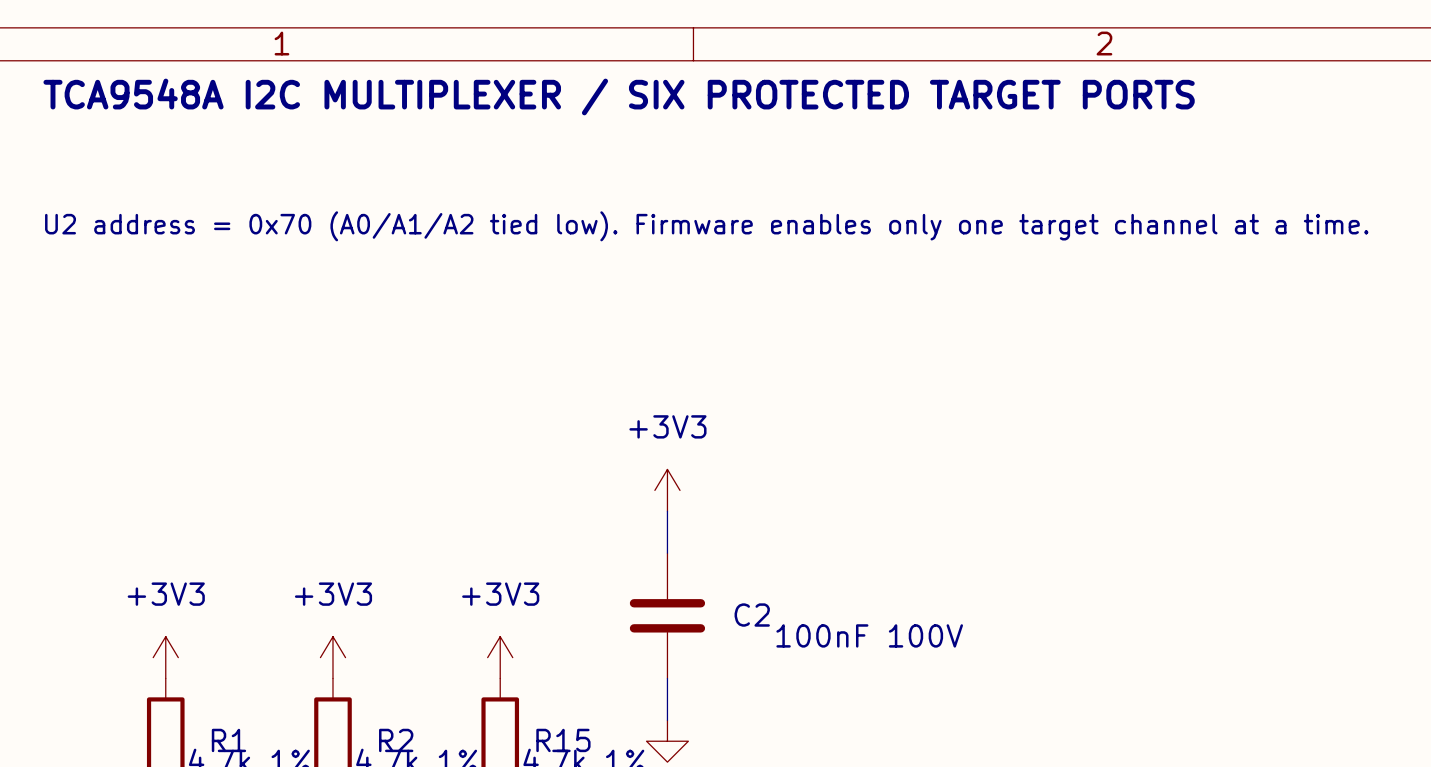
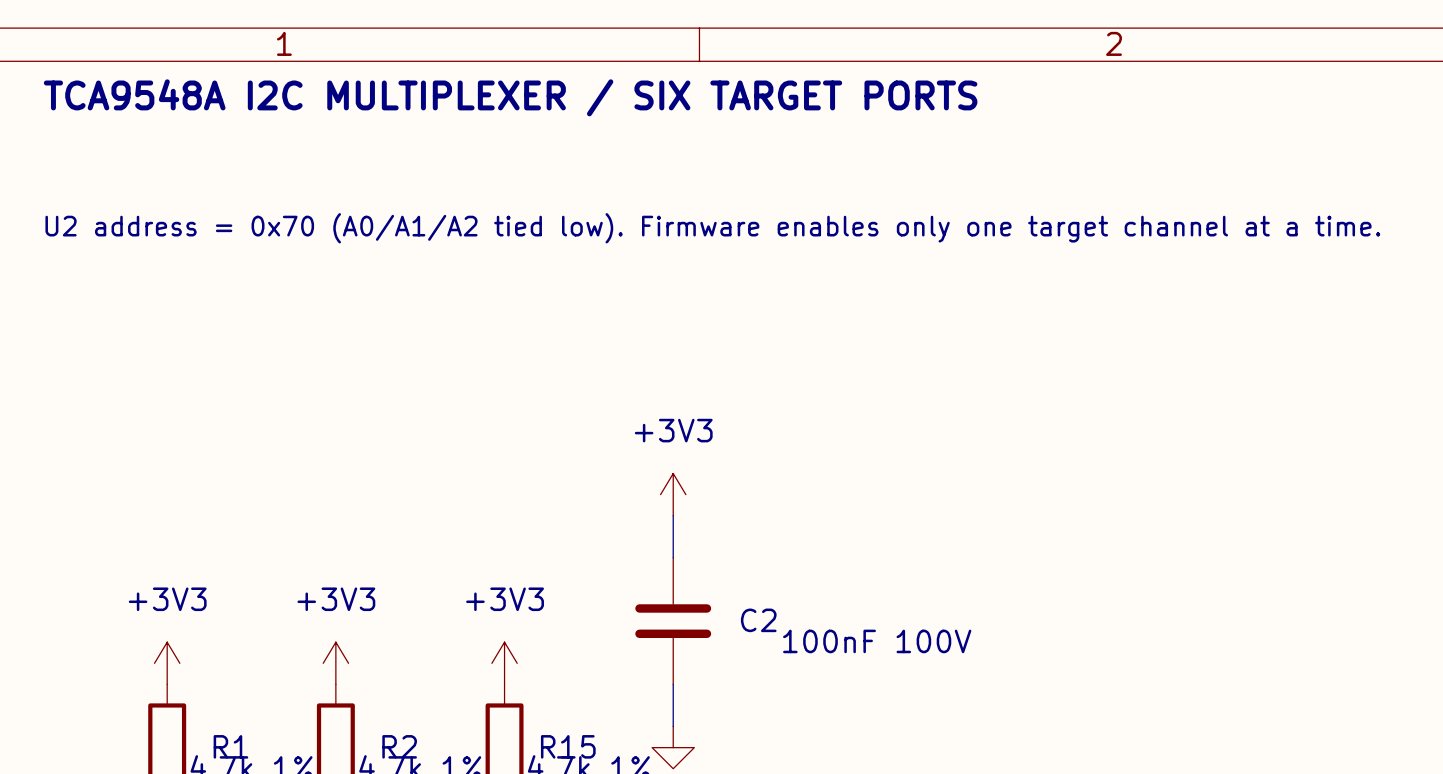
text: TCA9548A I2C MULTIPLEXER / SIX PROTECTED TARGET PORTS (619, 96) -> TCA9548A I2C MULTIPLEXER / SIX TARGET PORTS (510, 97)

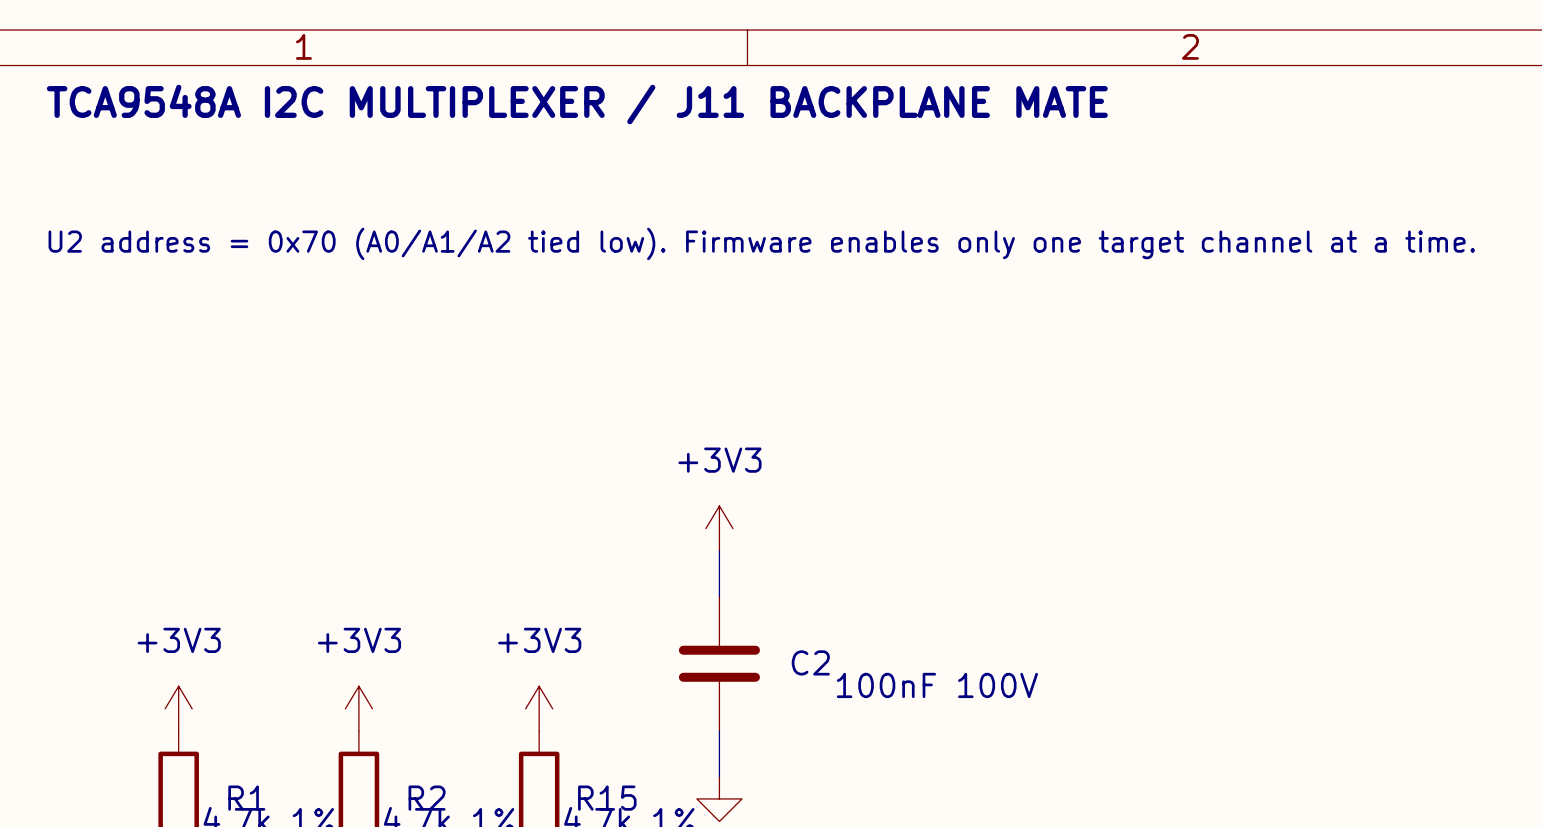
text: TCA9548A I2C MULTIPLEXER / SIX TARGET PORTS (510, 97) -> TCA9548A I2C MULTIPLEXER / J11 BACKPLANE MATE (577, 104)

